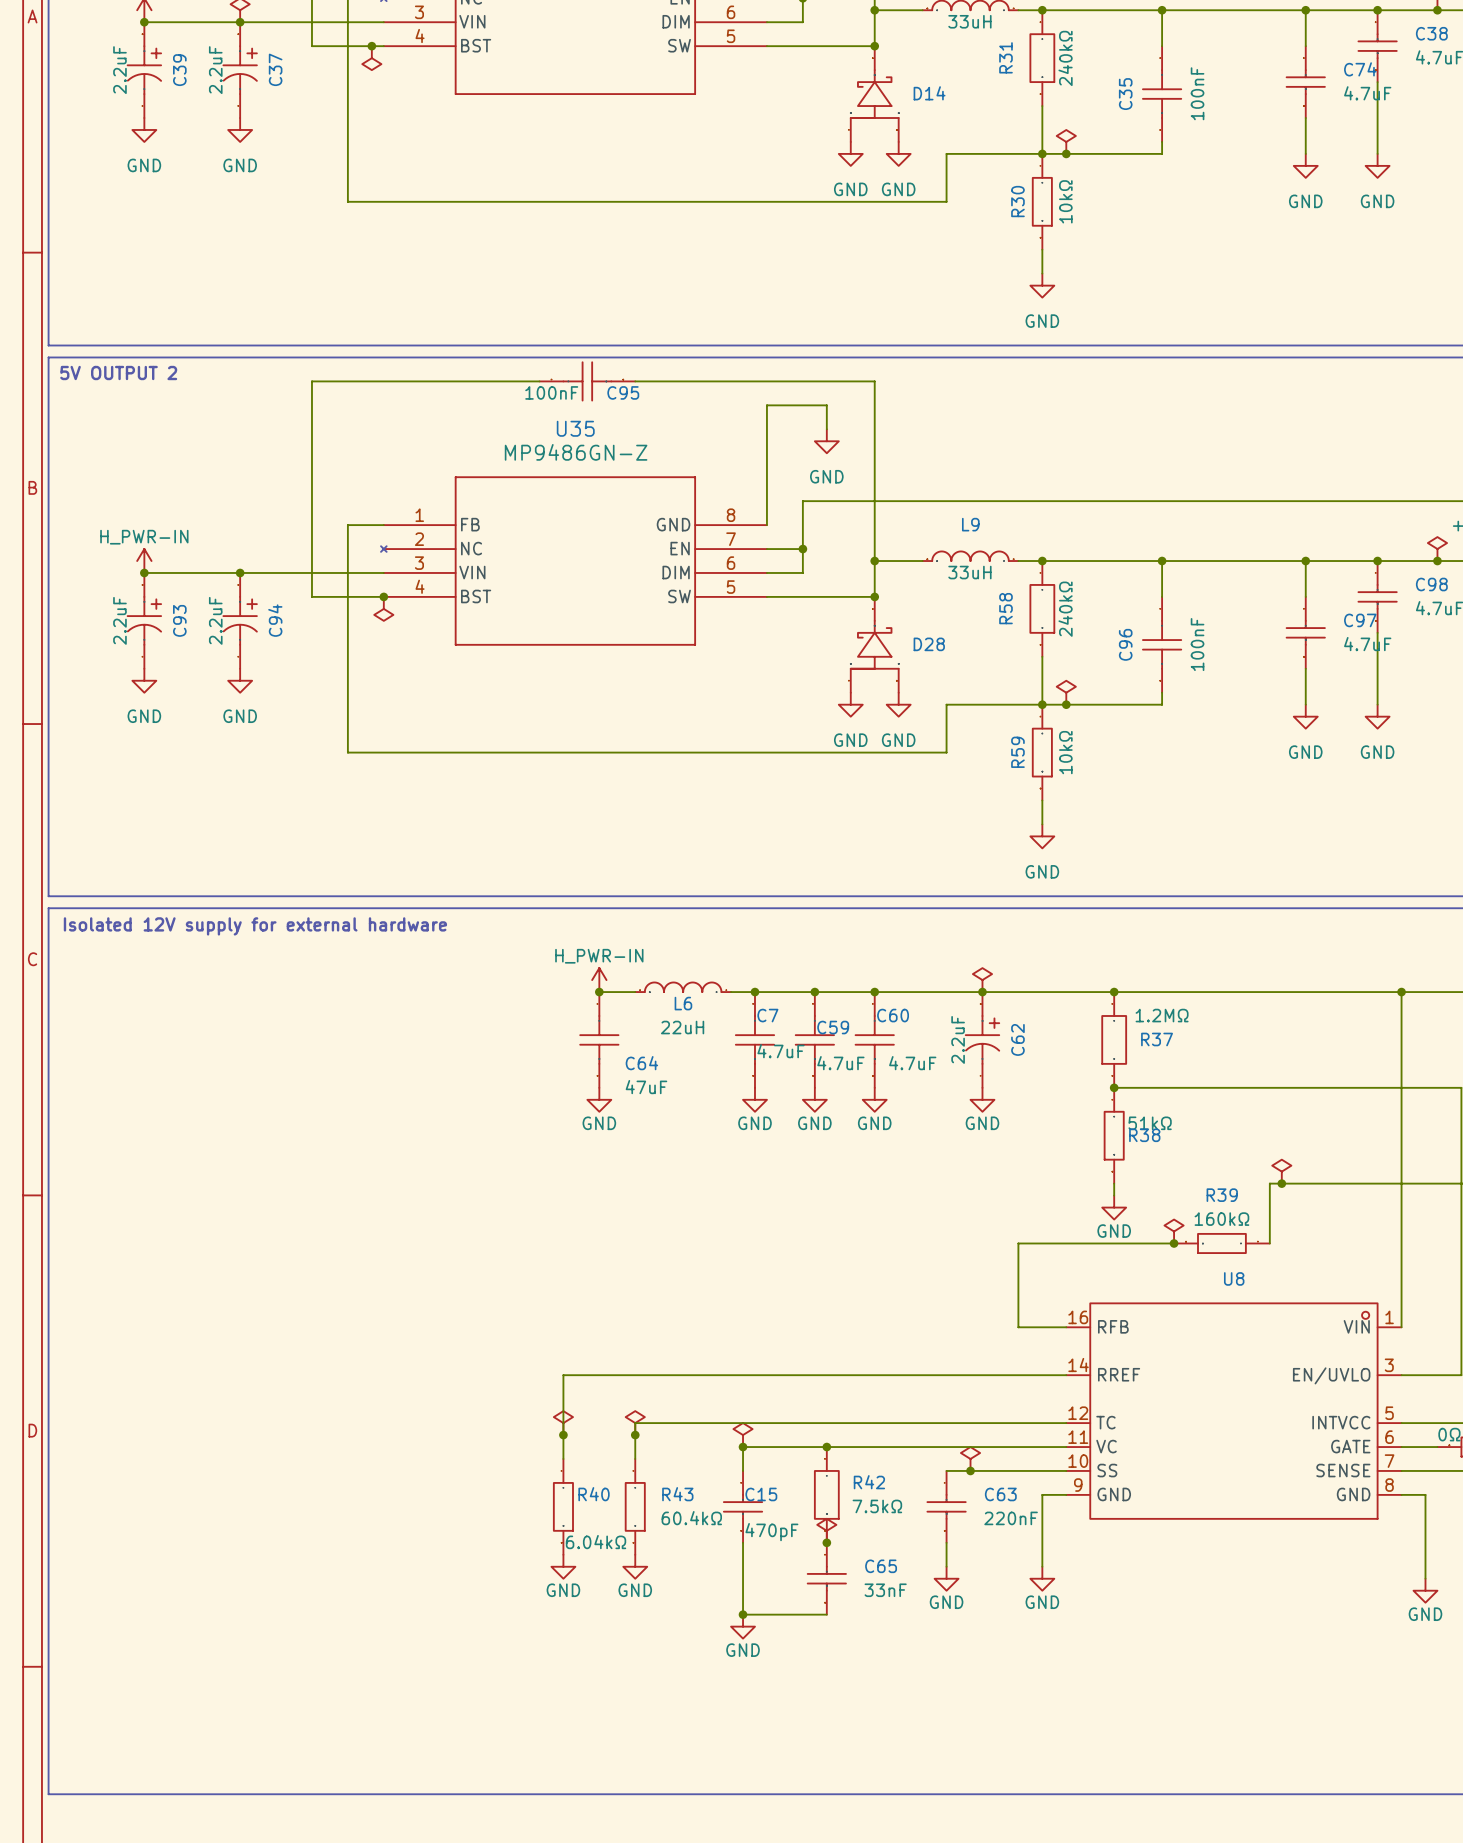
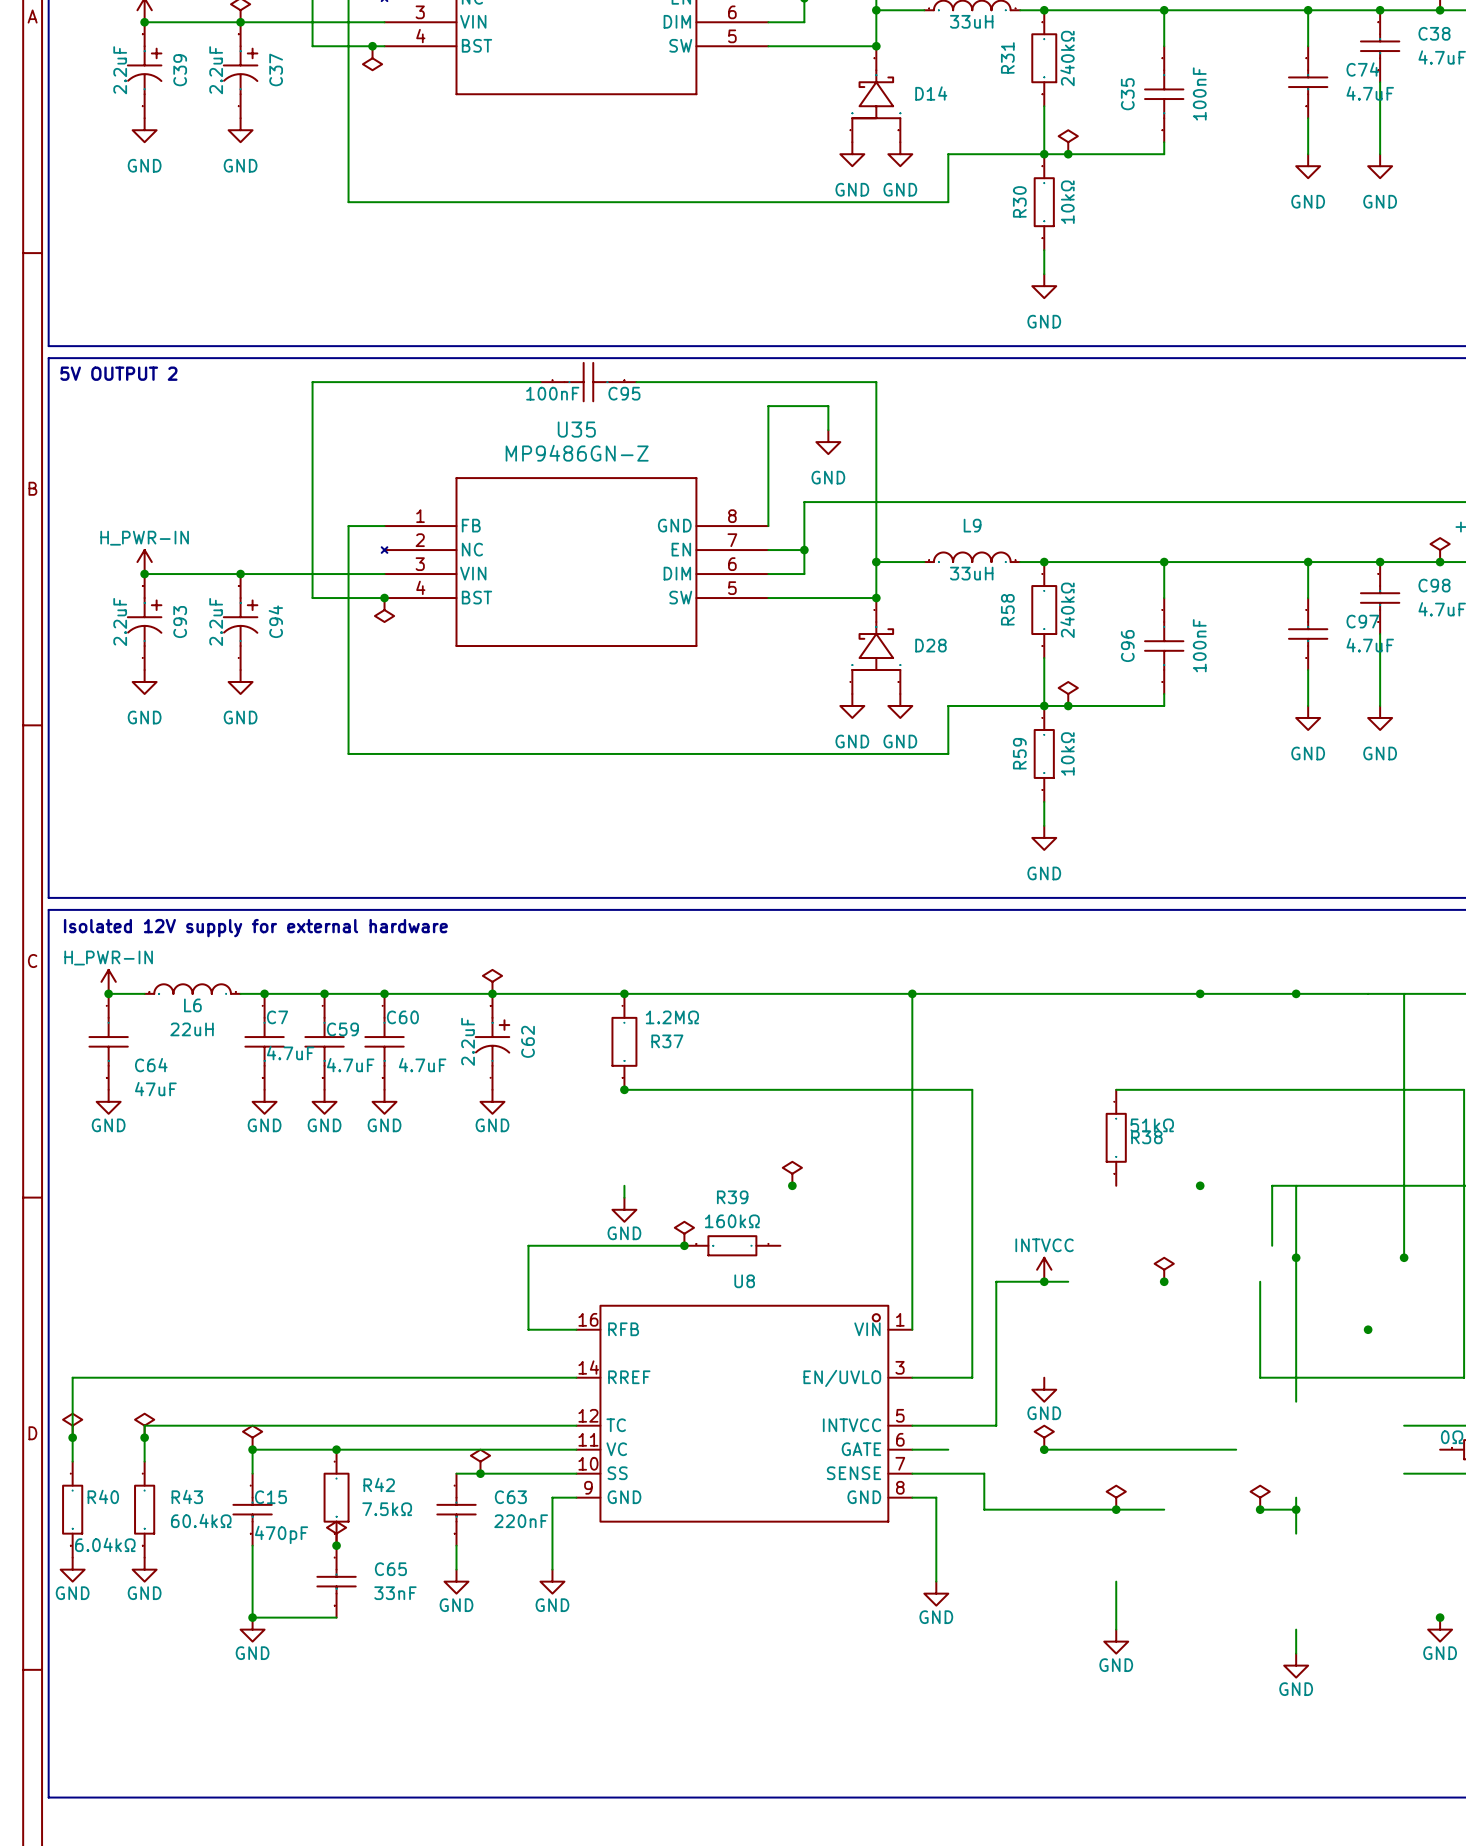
power symbol: none -> H_PWR-IN (108, 981)
power symbol: none -> (492, 981)
power symbol: H_PWR-IN (599, 980) -> none
power symbol: (982, 980) -> none
L6 position: (683, 987) -> (192, 989)
wire: none -> (108, 993) (144, 993)
junction: none -> (108, 993)
wire: none -> (240, 993) (600, 993)
junction: none -> (264, 993)
junction: none -> (324, 993)
junction: none -> (384, 993)
junction: none -> (492, 993)
junction position: (599, 992) -> (624, 993)
wire: none -> (636, 993) (732, 993)
junction: (754, 992) -> none
junction: (814, 992) -> none
junction: (874, 992) -> none
wire: none -> (912, 993) (912, 1329)
junction: none -> (912, 993)
junction: (982, 992) -> none
junction: (1114, 992) -> none
junction: none -> (1200, 993)
junction: none -> (1296, 993)
junction: (1401, 992) -> none
C64 position: (599, 1039) -> (108, 1041)
C7 position: (754, 1039) -> (264, 1041)
C59 position: (814, 1039) -> (324, 1041)
C60 position: (874, 1039) -> (384, 1041)
C62 position: (982, 1039) -> (492, 1041)
R37 position: (1114, 1039) -> (624, 1041)
junction: none -> (624, 1089)
junction: (1114, 1087) -> none
power symbol: none -> GND (108, 1101)
power symbol: none -> GND (264, 1101)
power symbol: none -> GND (324, 1101)
power symbol: none -> GND (384, 1101)
power symbol: none -> GND (492, 1101)
power symbol: GND (599, 1099) -> none
power symbol: GND (754, 1099) -> none
power symbol: GND (814, 1099) -> none
power symbol: GND (874, 1099) -> none
power symbol: GND (982, 1099) -> none
power symbol: none -> (792, 1173)
power symbol: (1281, 1171) -> none
wire: none -> (624, 1185) (624, 1197)
junction: none -> (792, 1185)
wire: (1114, 1183) (1114, 1195) -> none
junction: none -> (1200, 1185)
junction: (1281, 1183) -> none
wire: none -> (1296, 1185) (1296, 1401)
power symbol: none -> GND (624, 1209)
power symbol: GND (1114, 1207) -> none
power symbol: none -> (684, 1233)
power symbol position: (1174, 1231) -> (1164, 1269)
wire: none -> (684, 1245) (528, 1245) (528, 1329) (576, 1329)
junction: none -> (684, 1245)
wire: (1174, 1243) (1018, 1243) (1018, 1327) (1066, 1327) -> none
junction: (1174, 1243) -> none
R39 position: (1221, 1243) -> (732, 1245)
junction: none -> (1296, 1257)
wire: (1401, 1255) (1401, 1327) -> none
junction: none -> (1404, 1257)
power symbol: none -> INTVCC (1044, 1269)
junction: none -> (1044, 1281)
junction: none -> (1164, 1281)
wire: none -> (1260, 1281) (1260, 1377) (1404, 1377)
junction: none -> (1368, 1329)
wire: (563, 1375) (563, 1459) -> (564, 1377) (72, 1377) (72, 1461)
wire: (575, 1375) (910, 1375) -> none
wire: (970, 1375) (1066, 1375) -> (972, 1377) (972, 1089) (624, 1089)
power symbol: none -> GND (1044, 1389)
U8 position: (1233, 1411) -> (744, 1413)
power symbol: none -> (72, 1425)
power symbol: none -> (144, 1425)
power symbol: (563, 1423) -> none
wire: none -> (576, 1425) (144, 1425) (144, 1461)
power symbol: (635, 1423) -> none
wire: (910, 1423) (635, 1423) (635, 1459) -> none
wire: (994, 1423) (1066, 1423) -> (996, 1425) (996, 1281) (1068, 1281)
junction: none -> (72, 1437)
junction: none -> (144, 1437)
power symbol: none -> (252, 1437)
junction: (563, 1435) -> none
junction: (635, 1435) -> none
power symbol: (743, 1435) -> none
power symbol: none -> (1044, 1437)
junction: none -> (252, 1449)
junction: none -> (336, 1449)
wire: none -> (576, 1449) (252, 1449) (252, 1473)
junction: (743, 1447) -> none
junction: (826, 1447) -> none
wire: (910, 1447) (743, 1447) (743, 1470) -> none
wire: (946, 1447) (1042, 1447) -> none
junction: none -> (1044, 1449)
wire: none -> (1068, 1449) (1236, 1449)
wire: (1401, 1447) (1437, 1447) -> (1260, 1509) (1296, 1509)
power symbol: none -> (480, 1461)
power symbol: (970, 1459) -> none
wire: none -> (456, 1473) (576, 1473)
junction: none -> (480, 1473)
wire: none -> (912, 1473) (948, 1473)
junction: (970, 1470) -> none
wire: (982, 1470) (1066, 1470) -> (984, 1473) (984, 1509) (1164, 1509)
wire: none -> (576, 1497) (552, 1497) (552, 1569)
R42 position: (826, 1494) -> (336, 1497)
wire: none -> (912, 1497) (936, 1497) (936, 1581)
wire: (1066, 1494) (1042, 1494) (1042, 1566) -> none
power symbol: none -> (1116, 1497)
power symbol: none -> (1260, 1497)
wire: none -> (1296, 1497) (1296, 1533)
wire: (1401, 1494) (1425, 1494) (1425, 1578) -> none
R40 position: (563, 1506) -> (72, 1509)
R43 position: (635, 1506) -> (144, 1509)
C15 position: (743, 1506) -> (252, 1509)
C63 position: (946, 1506) -> (456, 1509)
junction: none -> (1116, 1509)
junction: none -> (1260, 1509)
junction: none -> (1296, 1509)
power symbol: none -> (336, 1533)
power symbol: (826, 1530) -> none
wire: none -> (252, 1545) (252, 1617) (336, 1617)
junction: none -> (336, 1545)
wire: none -> (456, 1545) (456, 1569)
wire: (743, 1542) (743, 1614) (826, 1614) -> none
junction: (826, 1542) -> none
wire: (946, 1542) (946, 1566) -> none
power symbol: none -> GND (72, 1569)
power symbol: none -> GND (144, 1569)
power symbol position: GND (563, 1566) -> GND (552, 1581)
power symbol: GND (635, 1566) -> none
power symbol: none -> GND (456, 1581)
C65 position: (826, 1578) -> (336, 1581)
power symbol position: GND (946, 1578) -> GND (936, 1593)
power symbol: GND (1042, 1578) -> none
wire: none -> (1116, 1581) (1116, 1629)
power symbol position: GND (1425, 1590) -> GND (1440, 1629)
junction: none -> (252, 1617)
junction: (743, 1614) -> none
junction: none -> (1440, 1617)
power symbol: none -> GND (252, 1629)
power symbol: GND (743, 1626) -> none
wire: none -> (1296, 1629) (1296, 1653)
power symbol: none -> GND (1116, 1641)
power symbol: none -> GND (1296, 1665)

